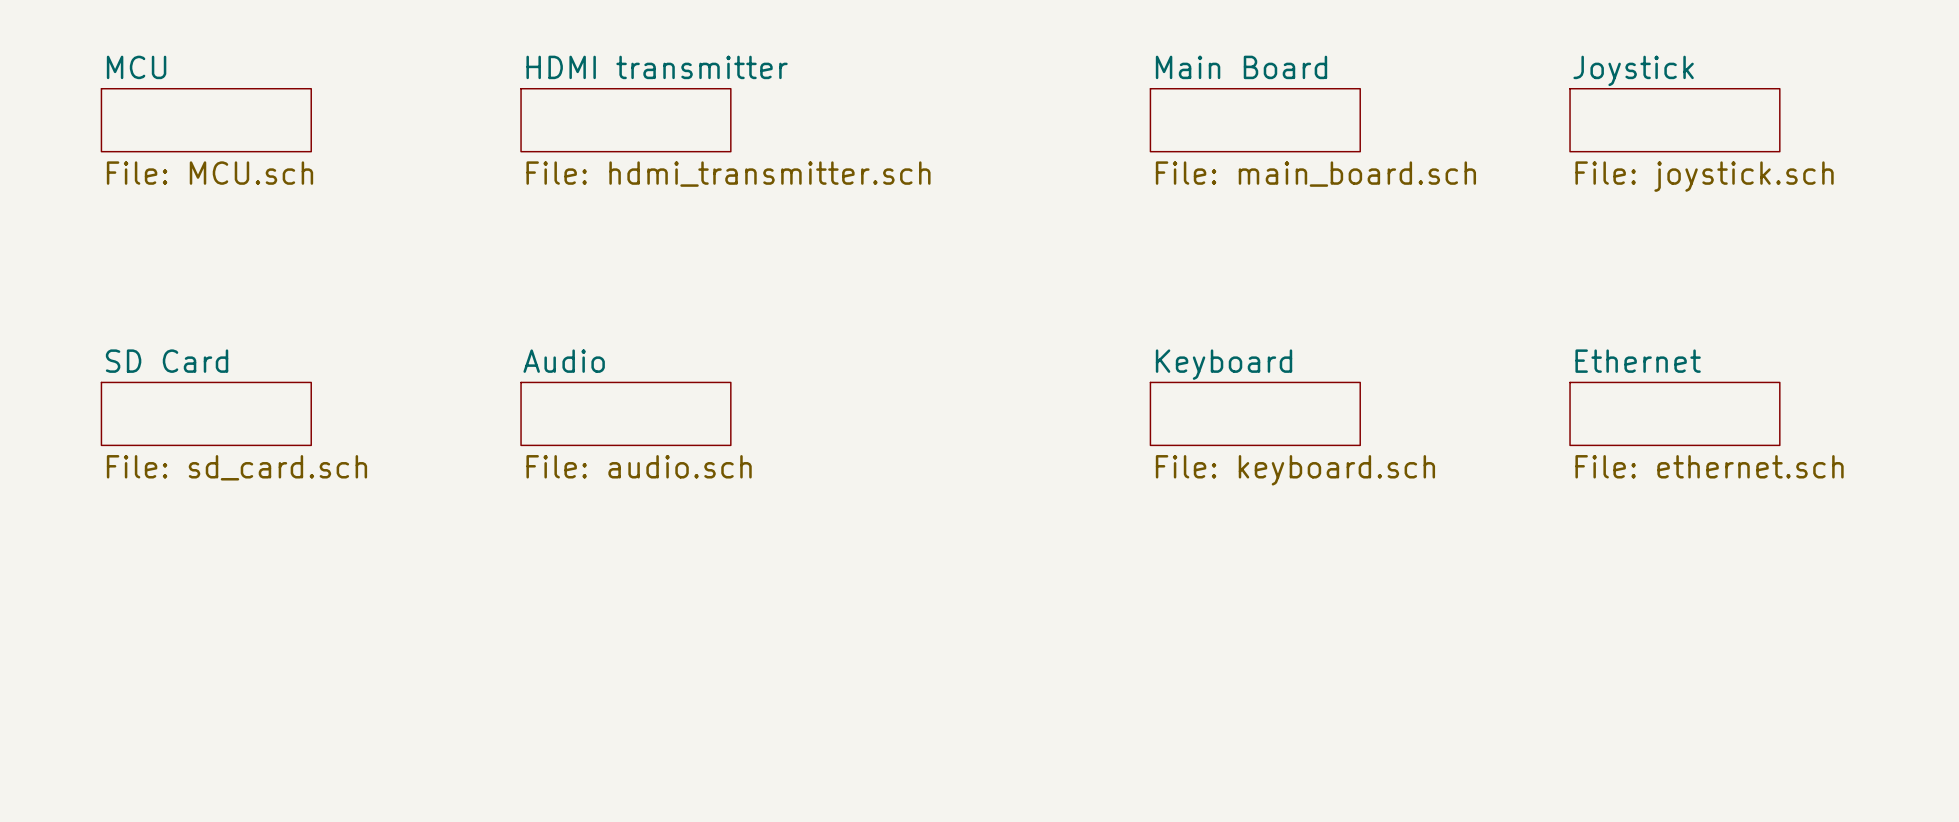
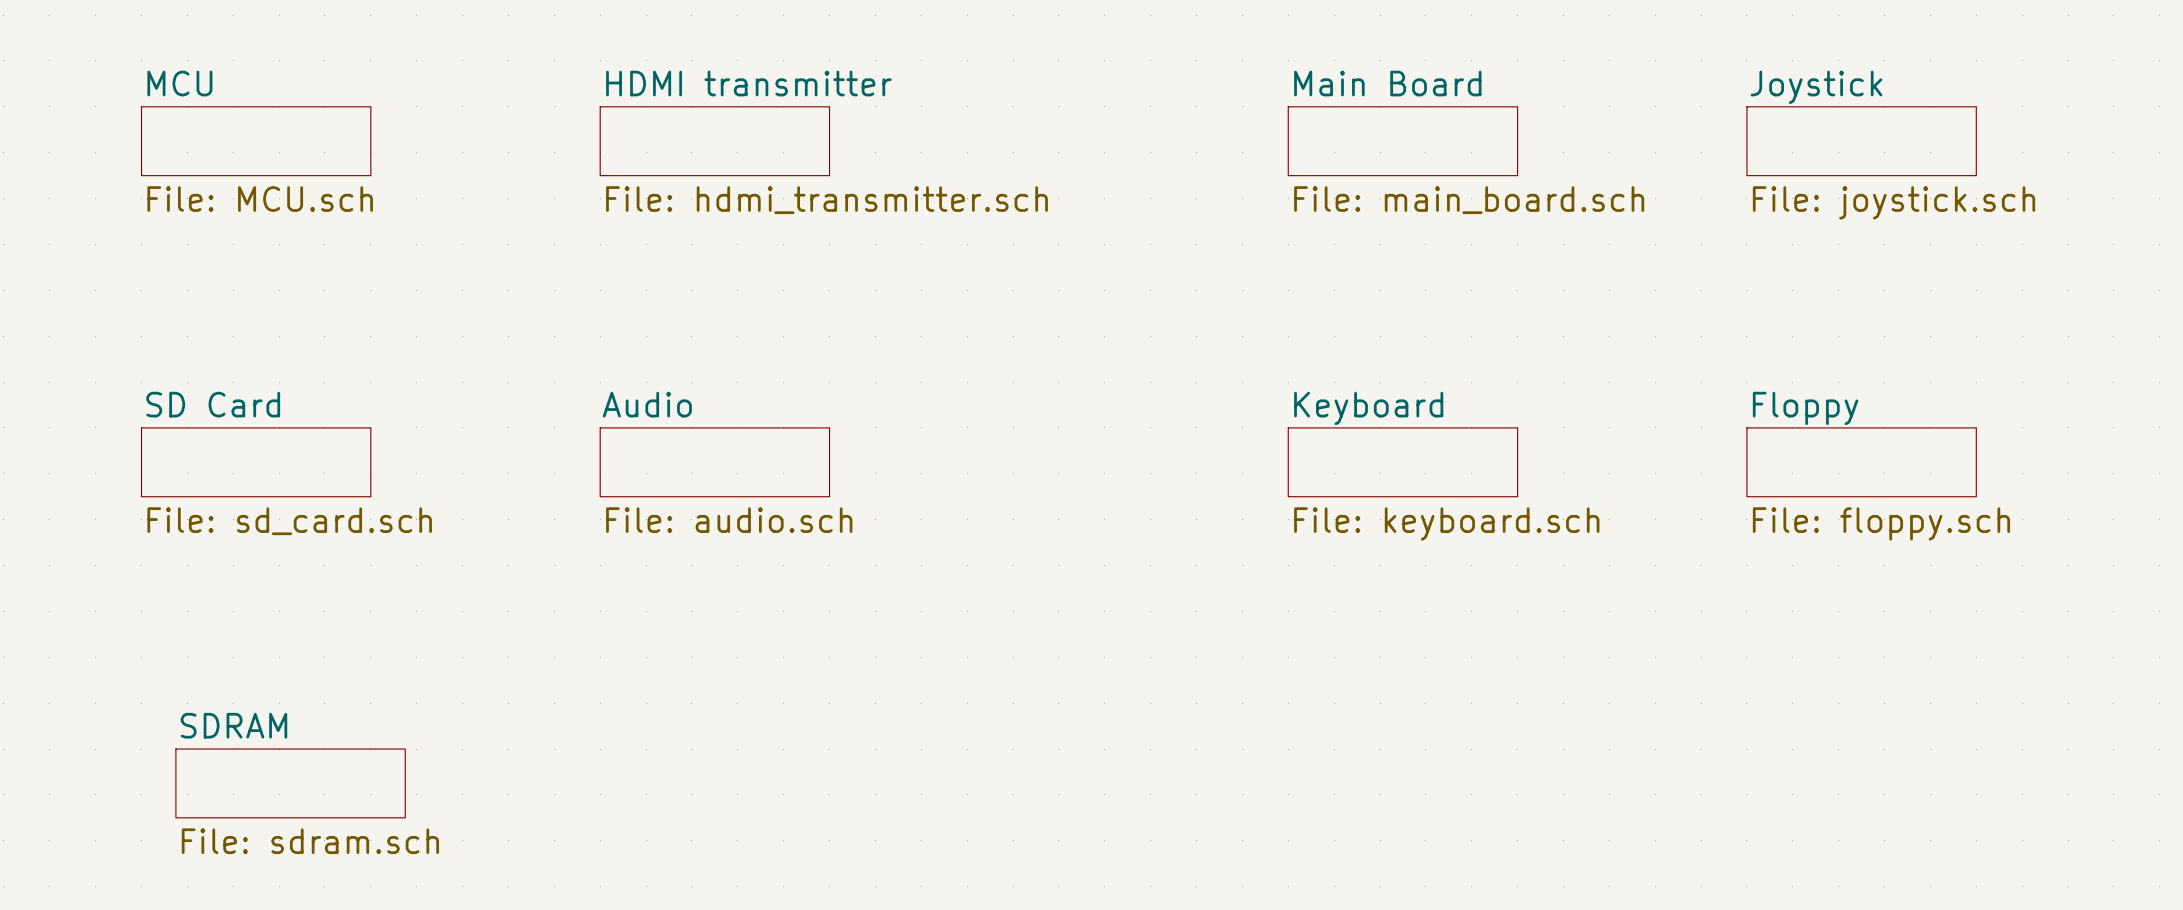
sheet Ethernet name: Ethernet (1638, 361) -> Floppy (1805, 408)
sheet Ethernet value: File: ethernet.sch (1709, 466) -> File: floppy.sch (1881, 523)
sheet SDRAM: none -> File: sdram.sch (290, 783)

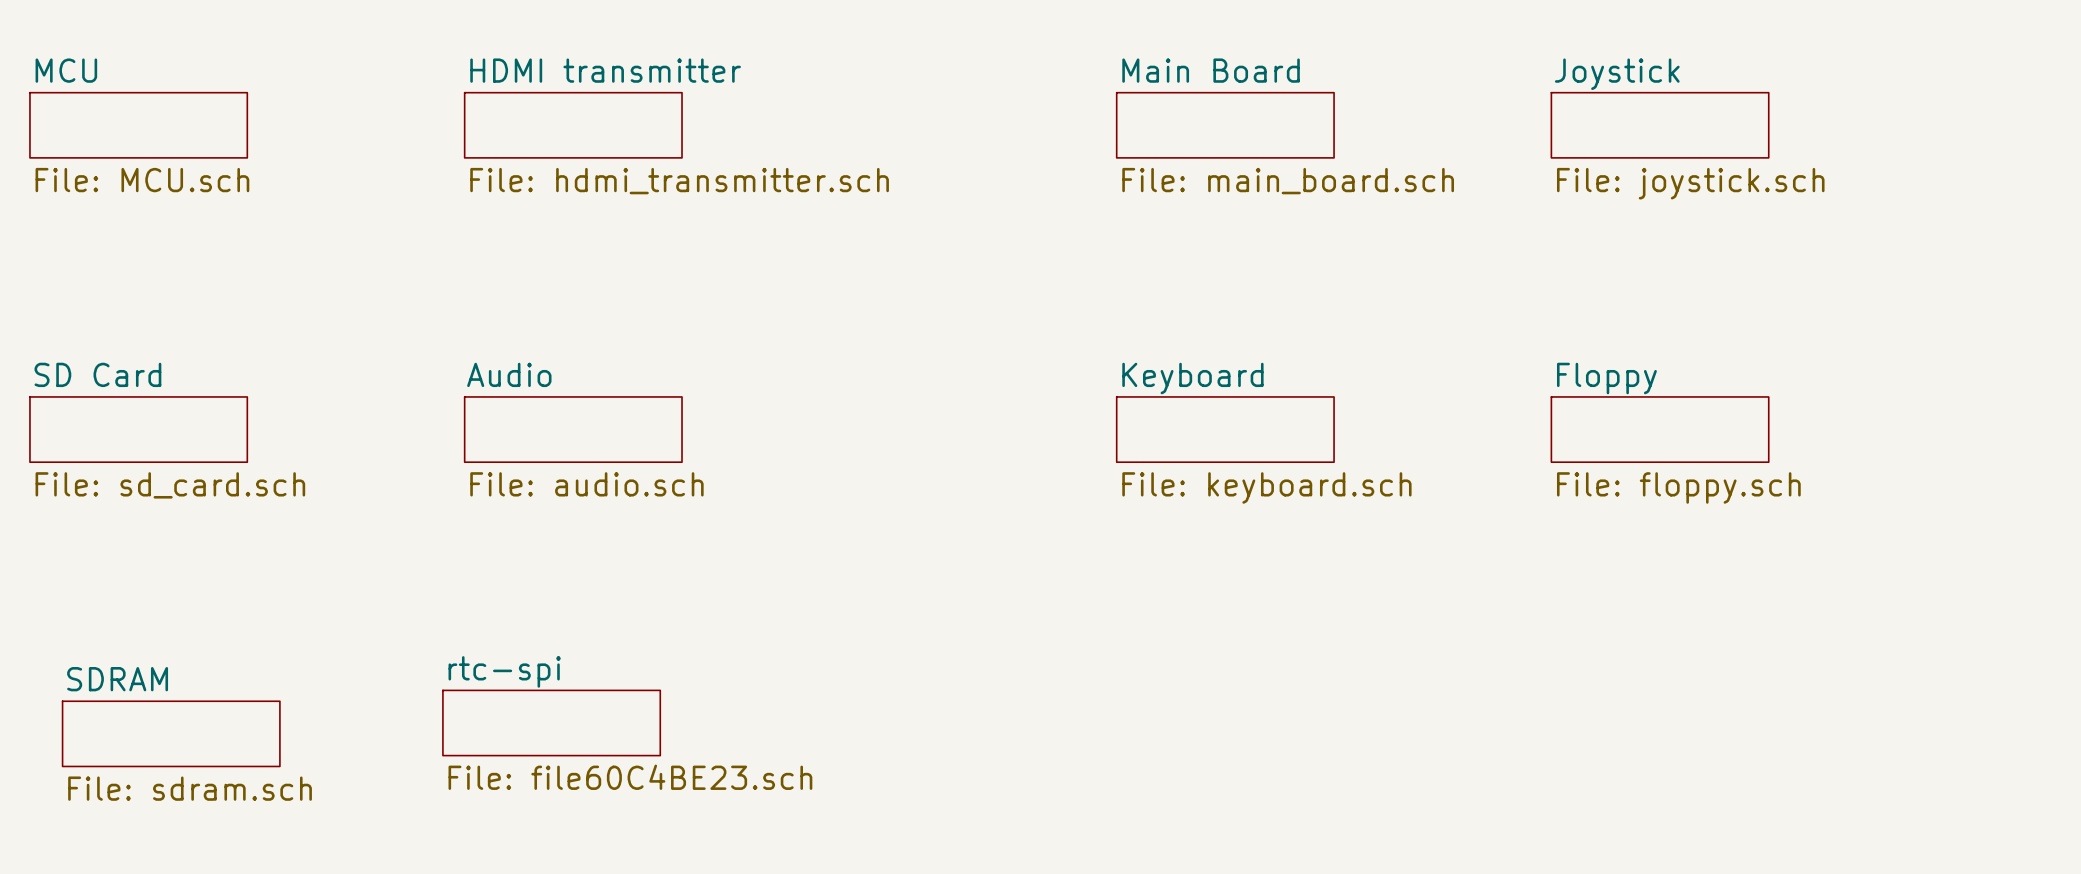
sheet MCU position: (256, 141) -> (138, 125)
sheet HDMI transmitter position: (714, 141) -> (573, 125)
sheet Main Board position: (1402, 141) -> (1225, 125)
sheet Joystick position: (1861, 141) -> (1660, 125)
sheet SD Card position: (256, 462) -> (138, 429)
sheet Audio position: (714, 462) -> (573, 429)
sheet Keyboard position: (1402, 462) -> (1225, 429)
sheet Floppy position: (1861, 462) -> (1660, 429)
sheet SDRAM position: (290, 783) -> (171, 733)
sheet rtc-spi: none -> File: file60C4BE23.sch (551, 722)

